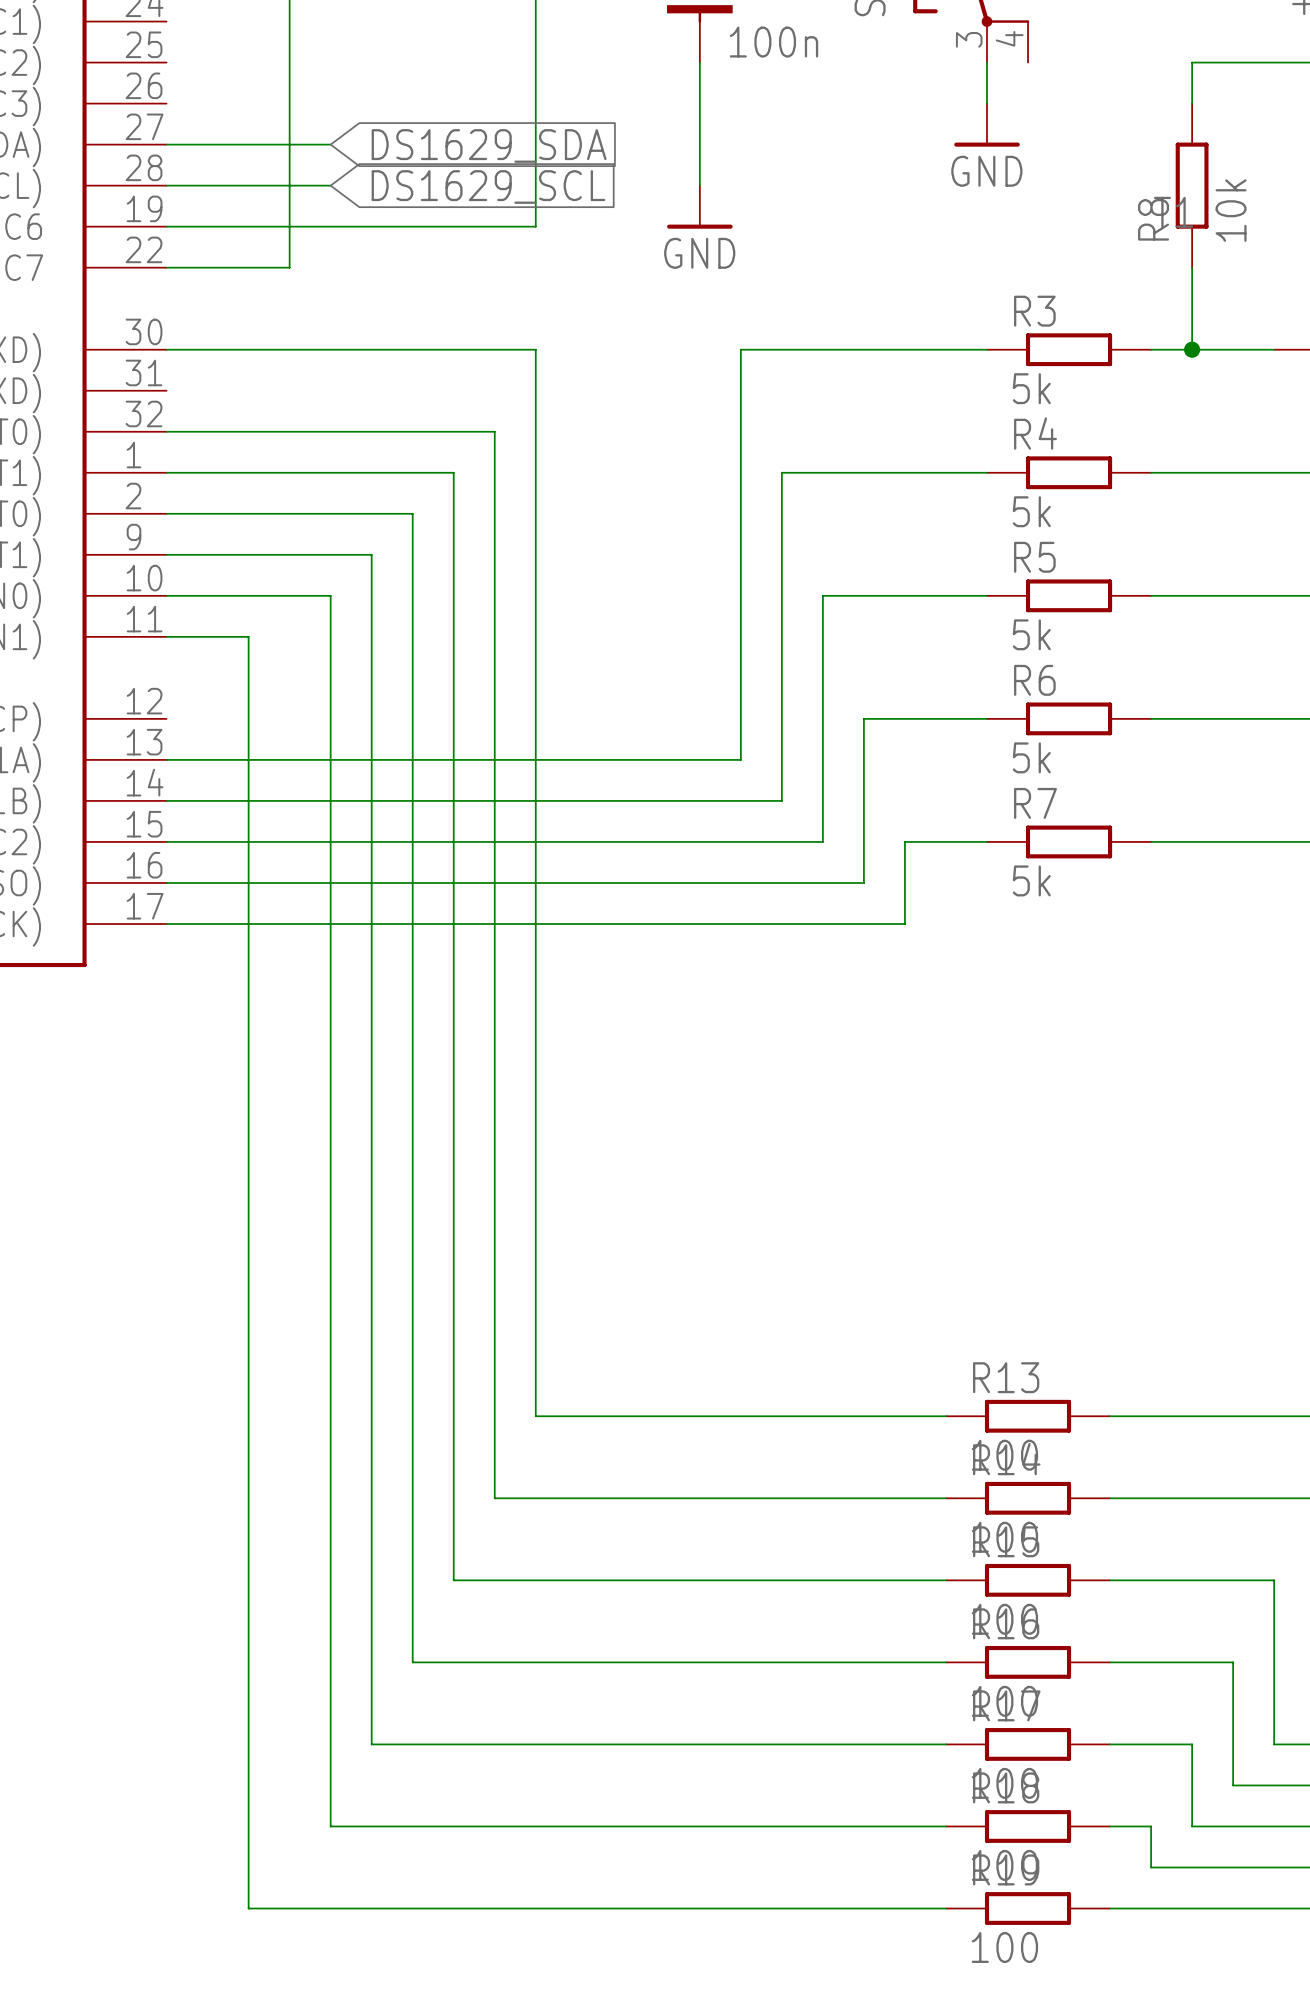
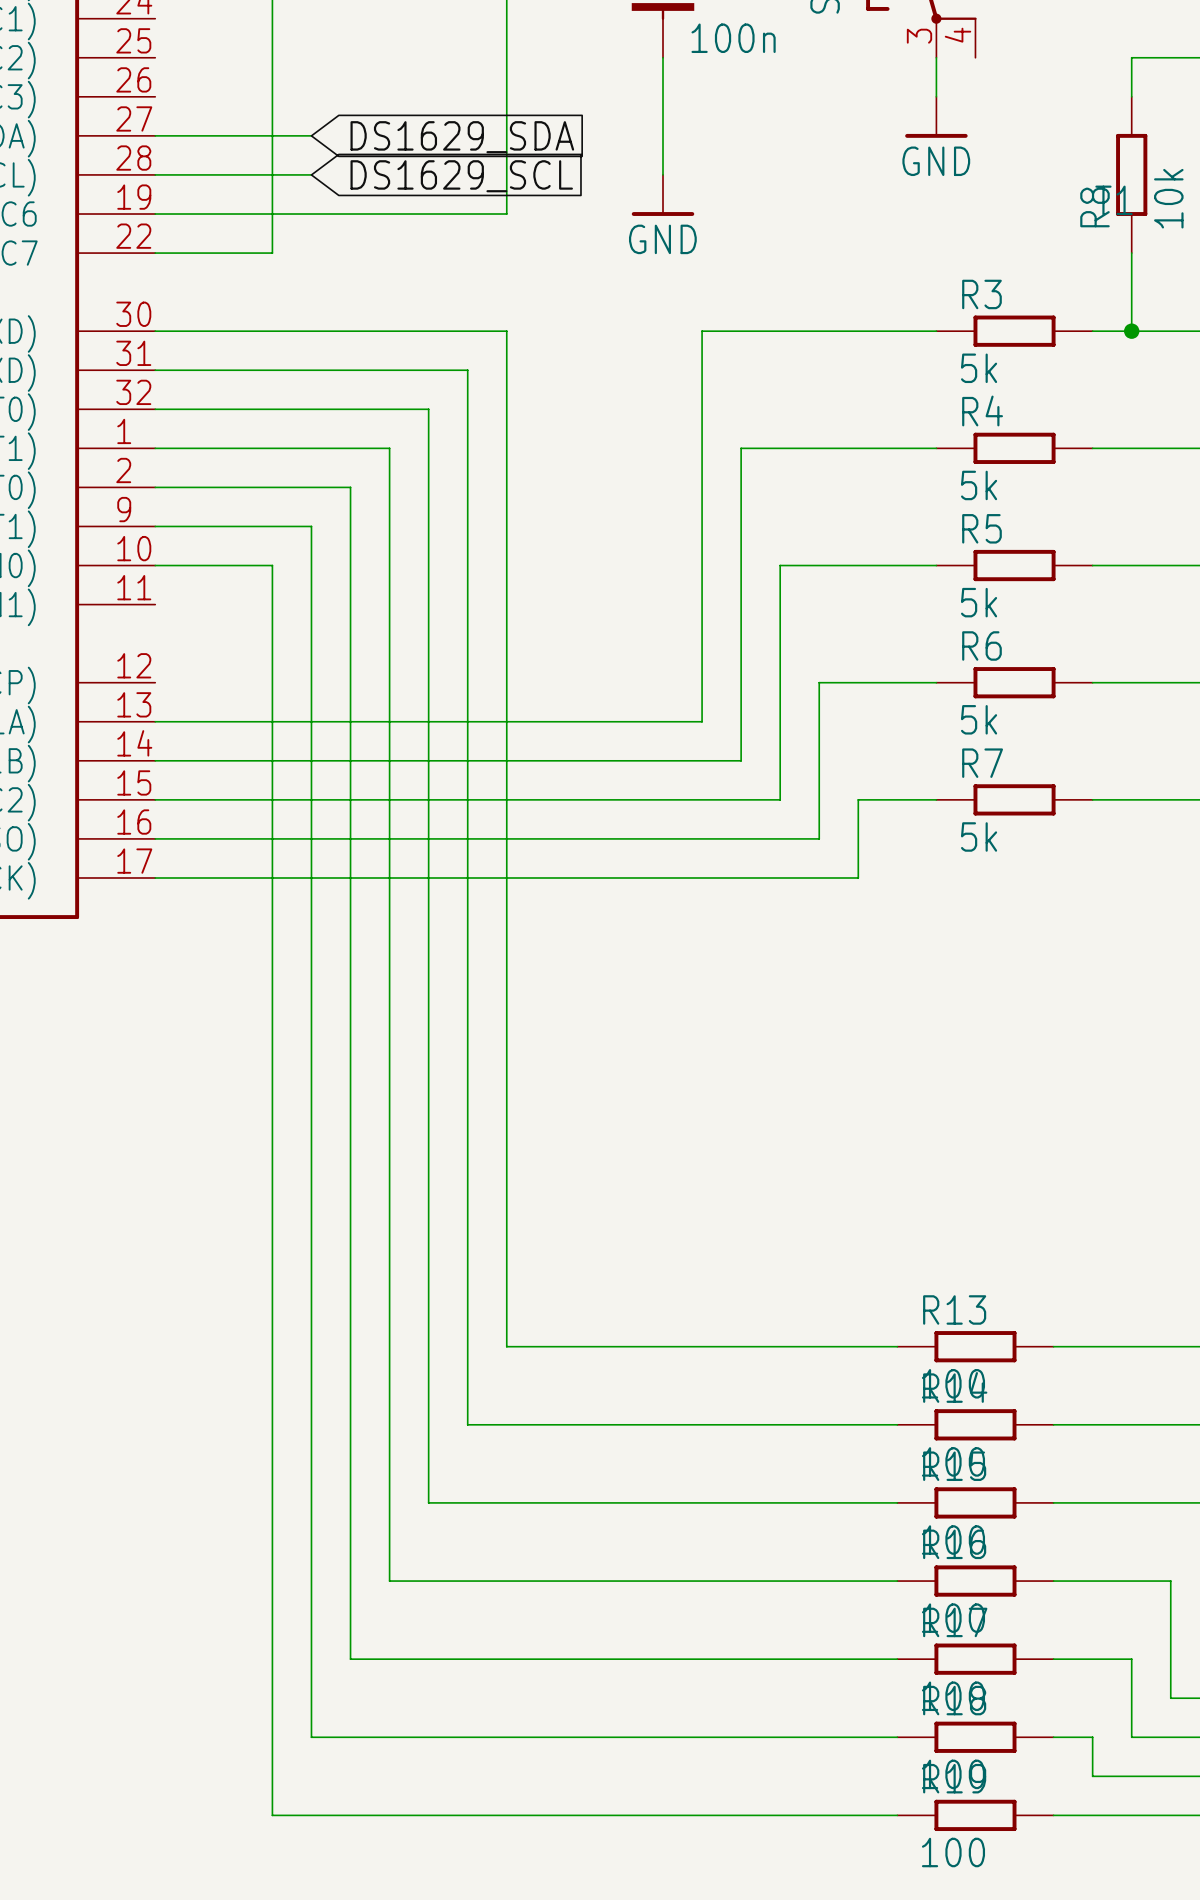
wire: (453, 431) (494, 431) -> (155, 370) (467, 370) (467, 409)
wire: (412, 472) (453, 472) -> (428, 409) (428, 448)
wire: none -> (389, 448) (389, 487)
wire: (371, 513) (412, 513) -> (350, 487) (350, 526)
wire: (330, 554) (371, 554) -> none
wire: (289, 595) (330, 595) -> (311, 526) (311, 565)
wire: (166, 636) (248, 636) (248, 1908) (289, 1908) -> (272, 565) (272, 1815)

